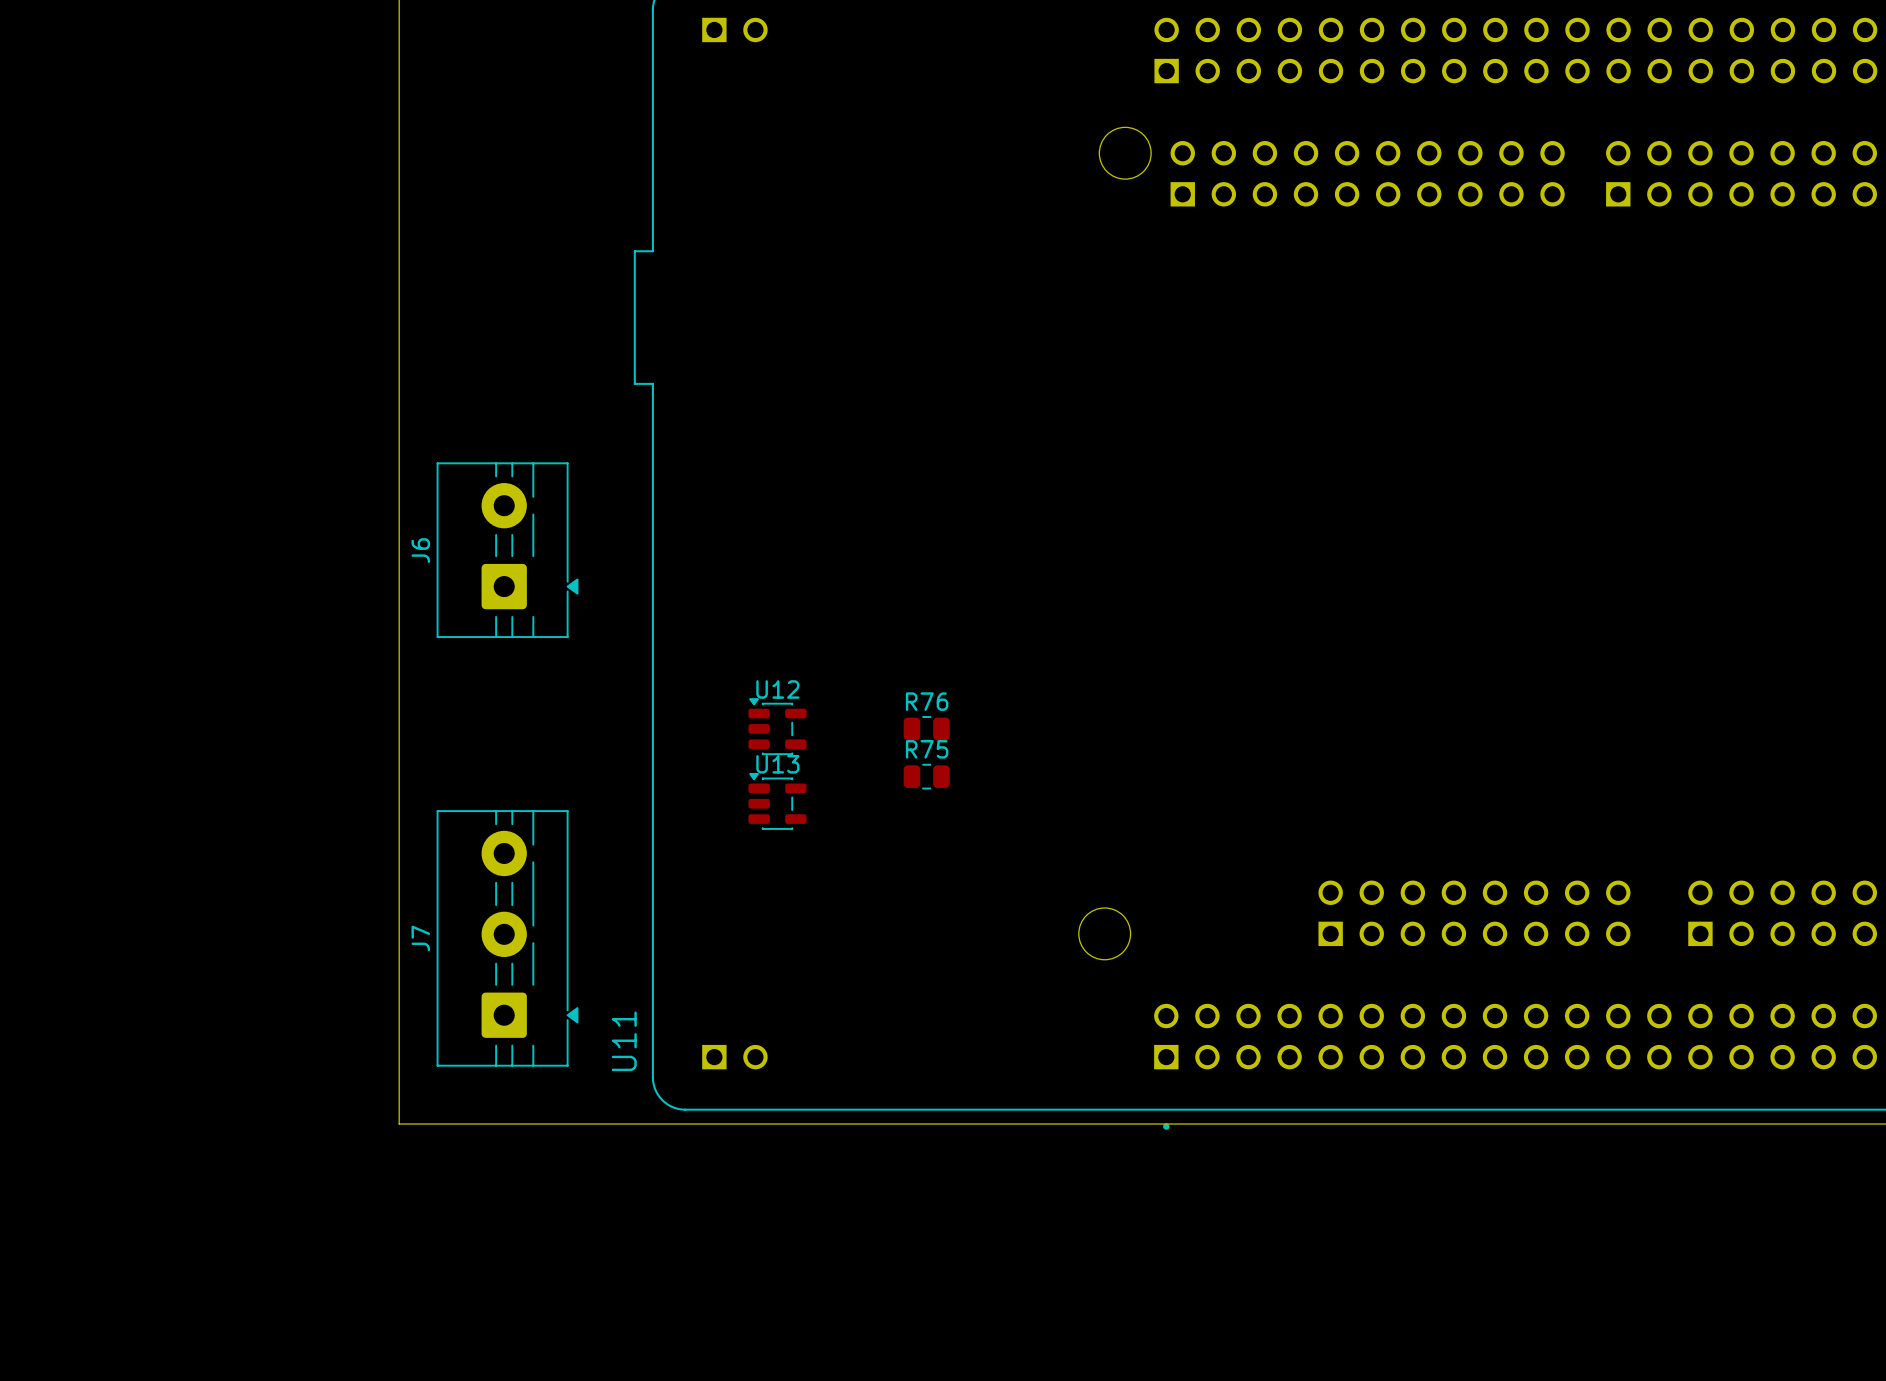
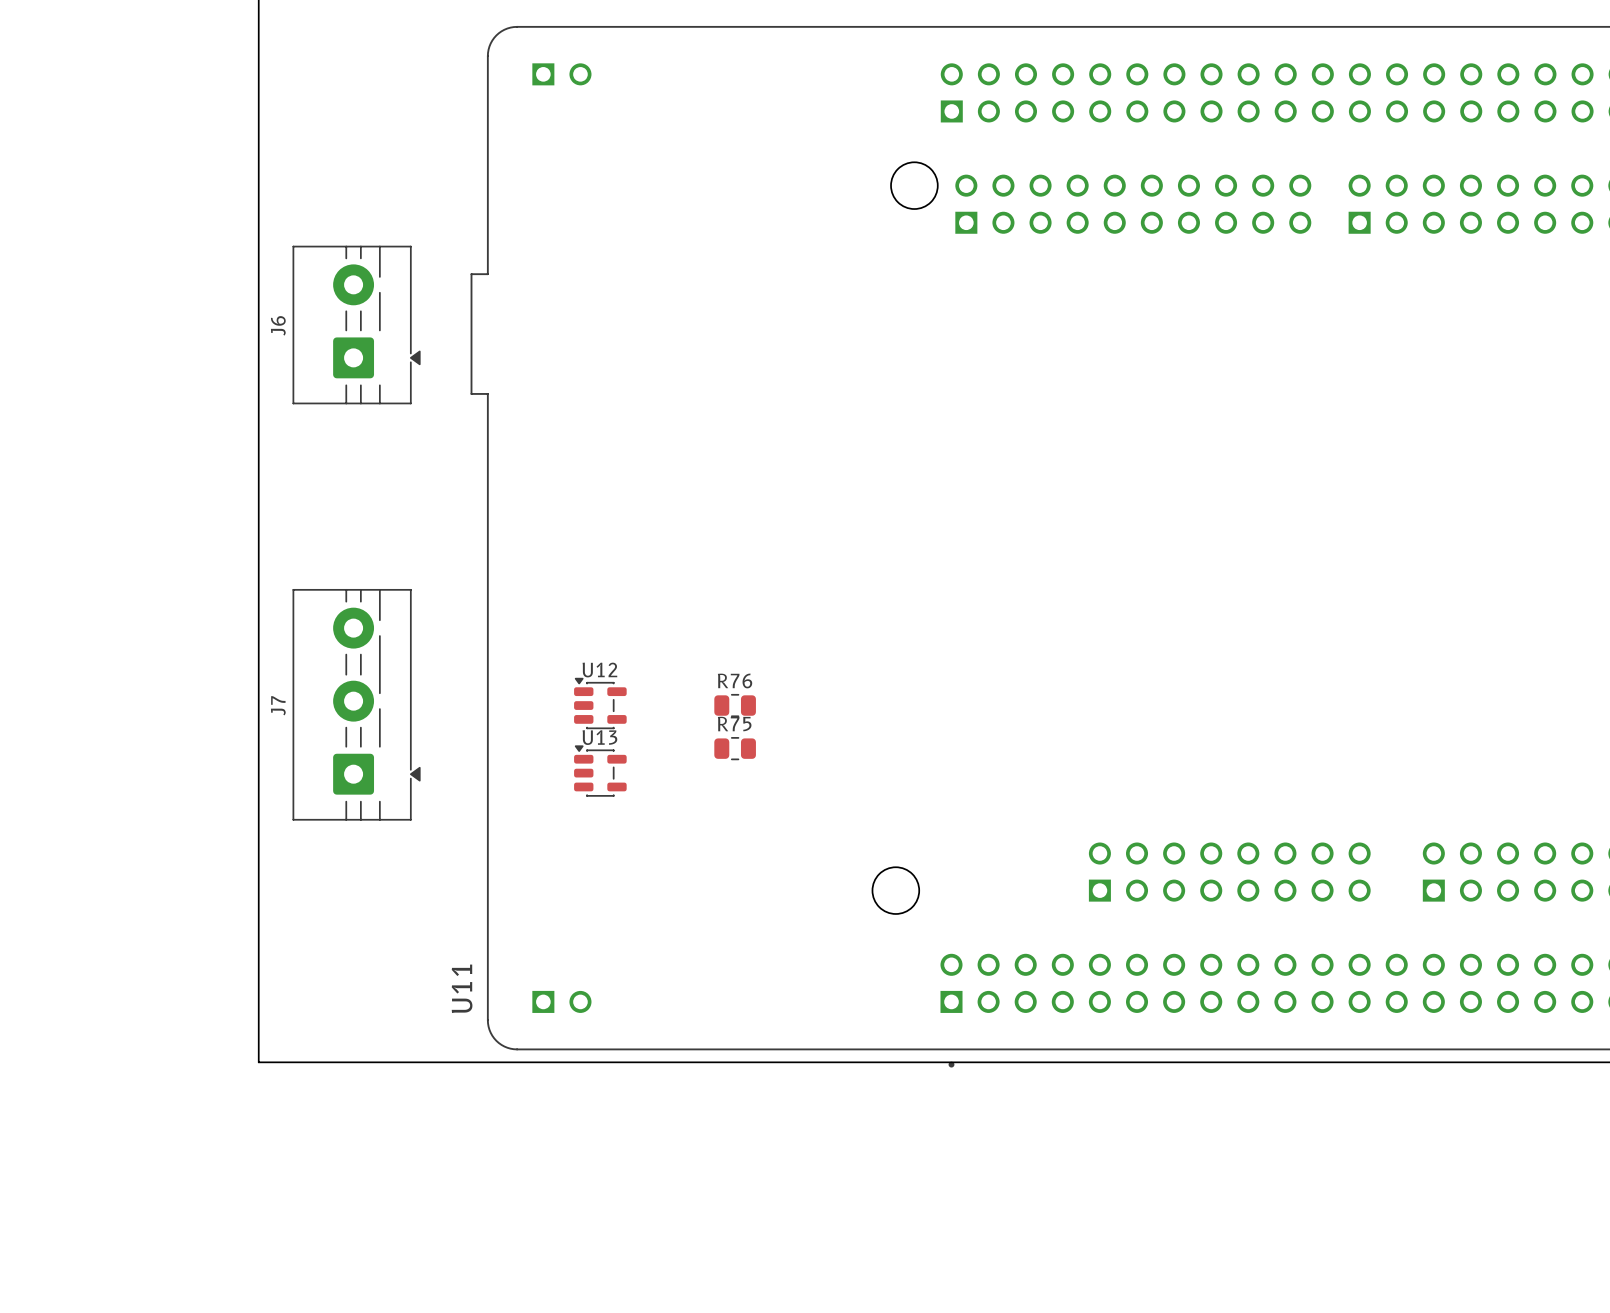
J6 position: (507, 550) -> (356, 325)
J7 position: (507, 938) -> (356, 704)

